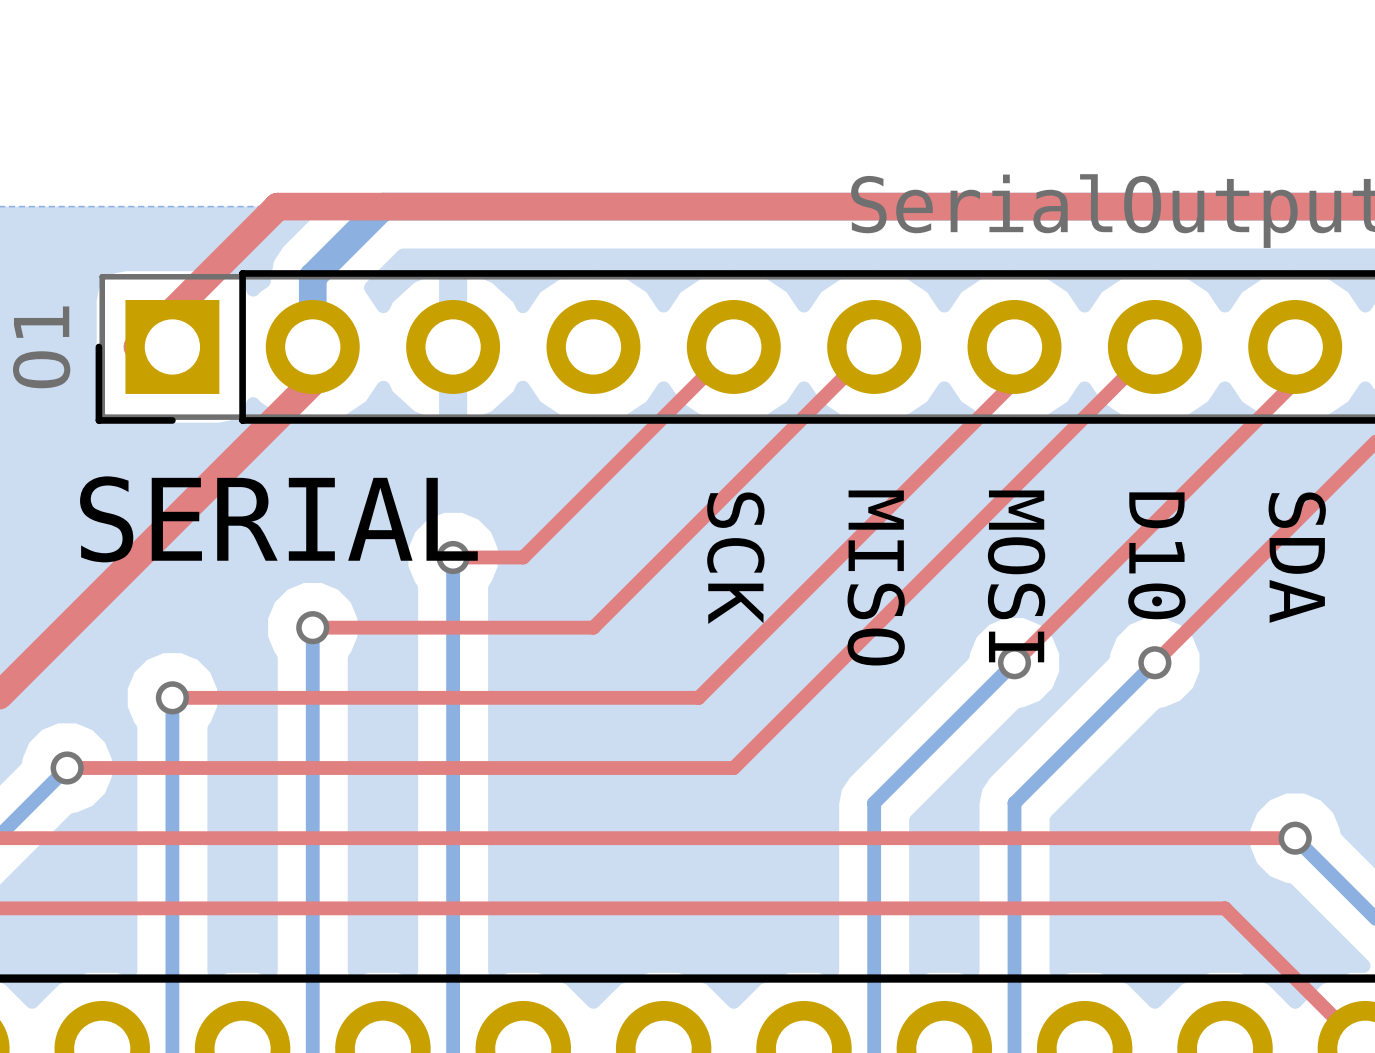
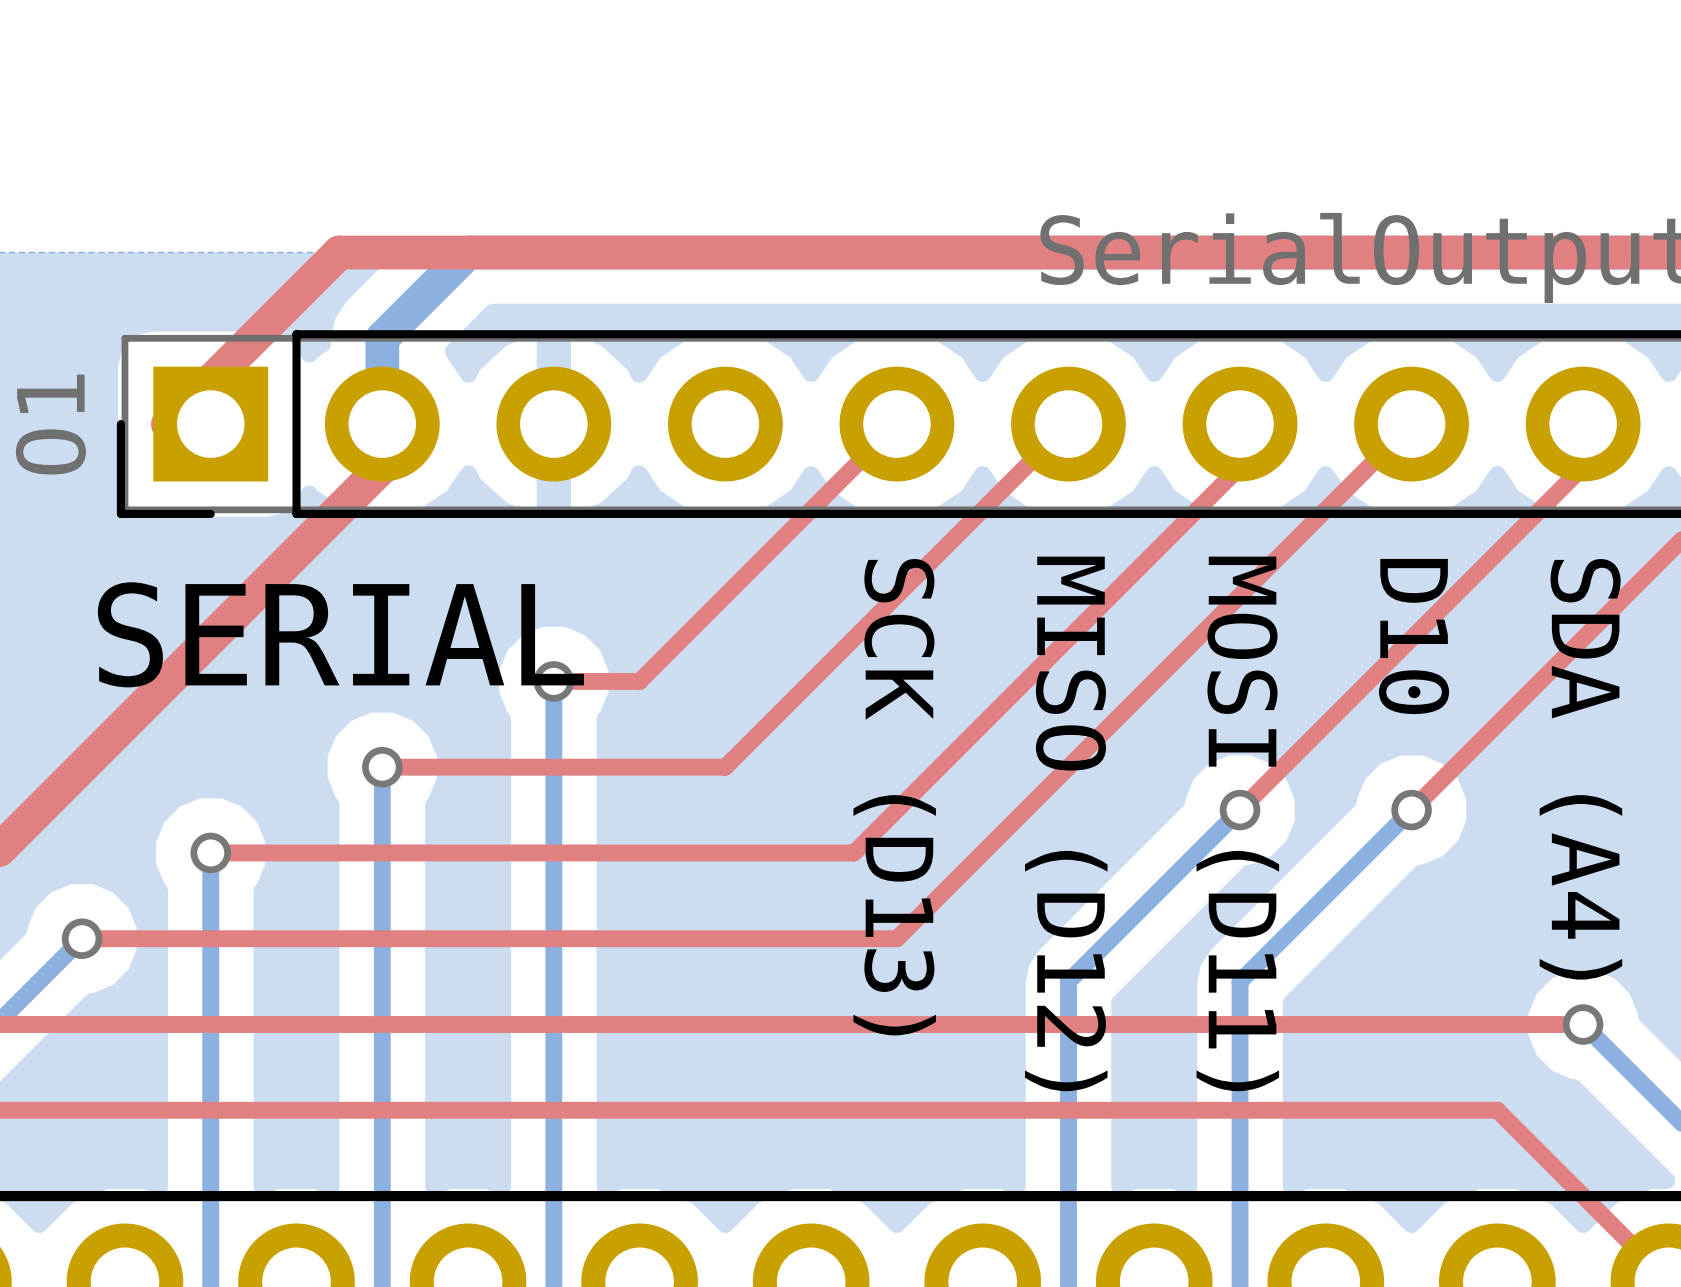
text position: D10 (1156, 555) -> D10 (1414, 636)
text: SDA (1297, 557) -> SDA (A4) (1580, 769)
text: SCK (735, 558) -> SCK (D13) (894, 797)
text: MOSI (1016, 576) -> MOSI (D11) (1237, 823)
text: MISO (876, 578) -> MISO (D12) (1066, 823)

